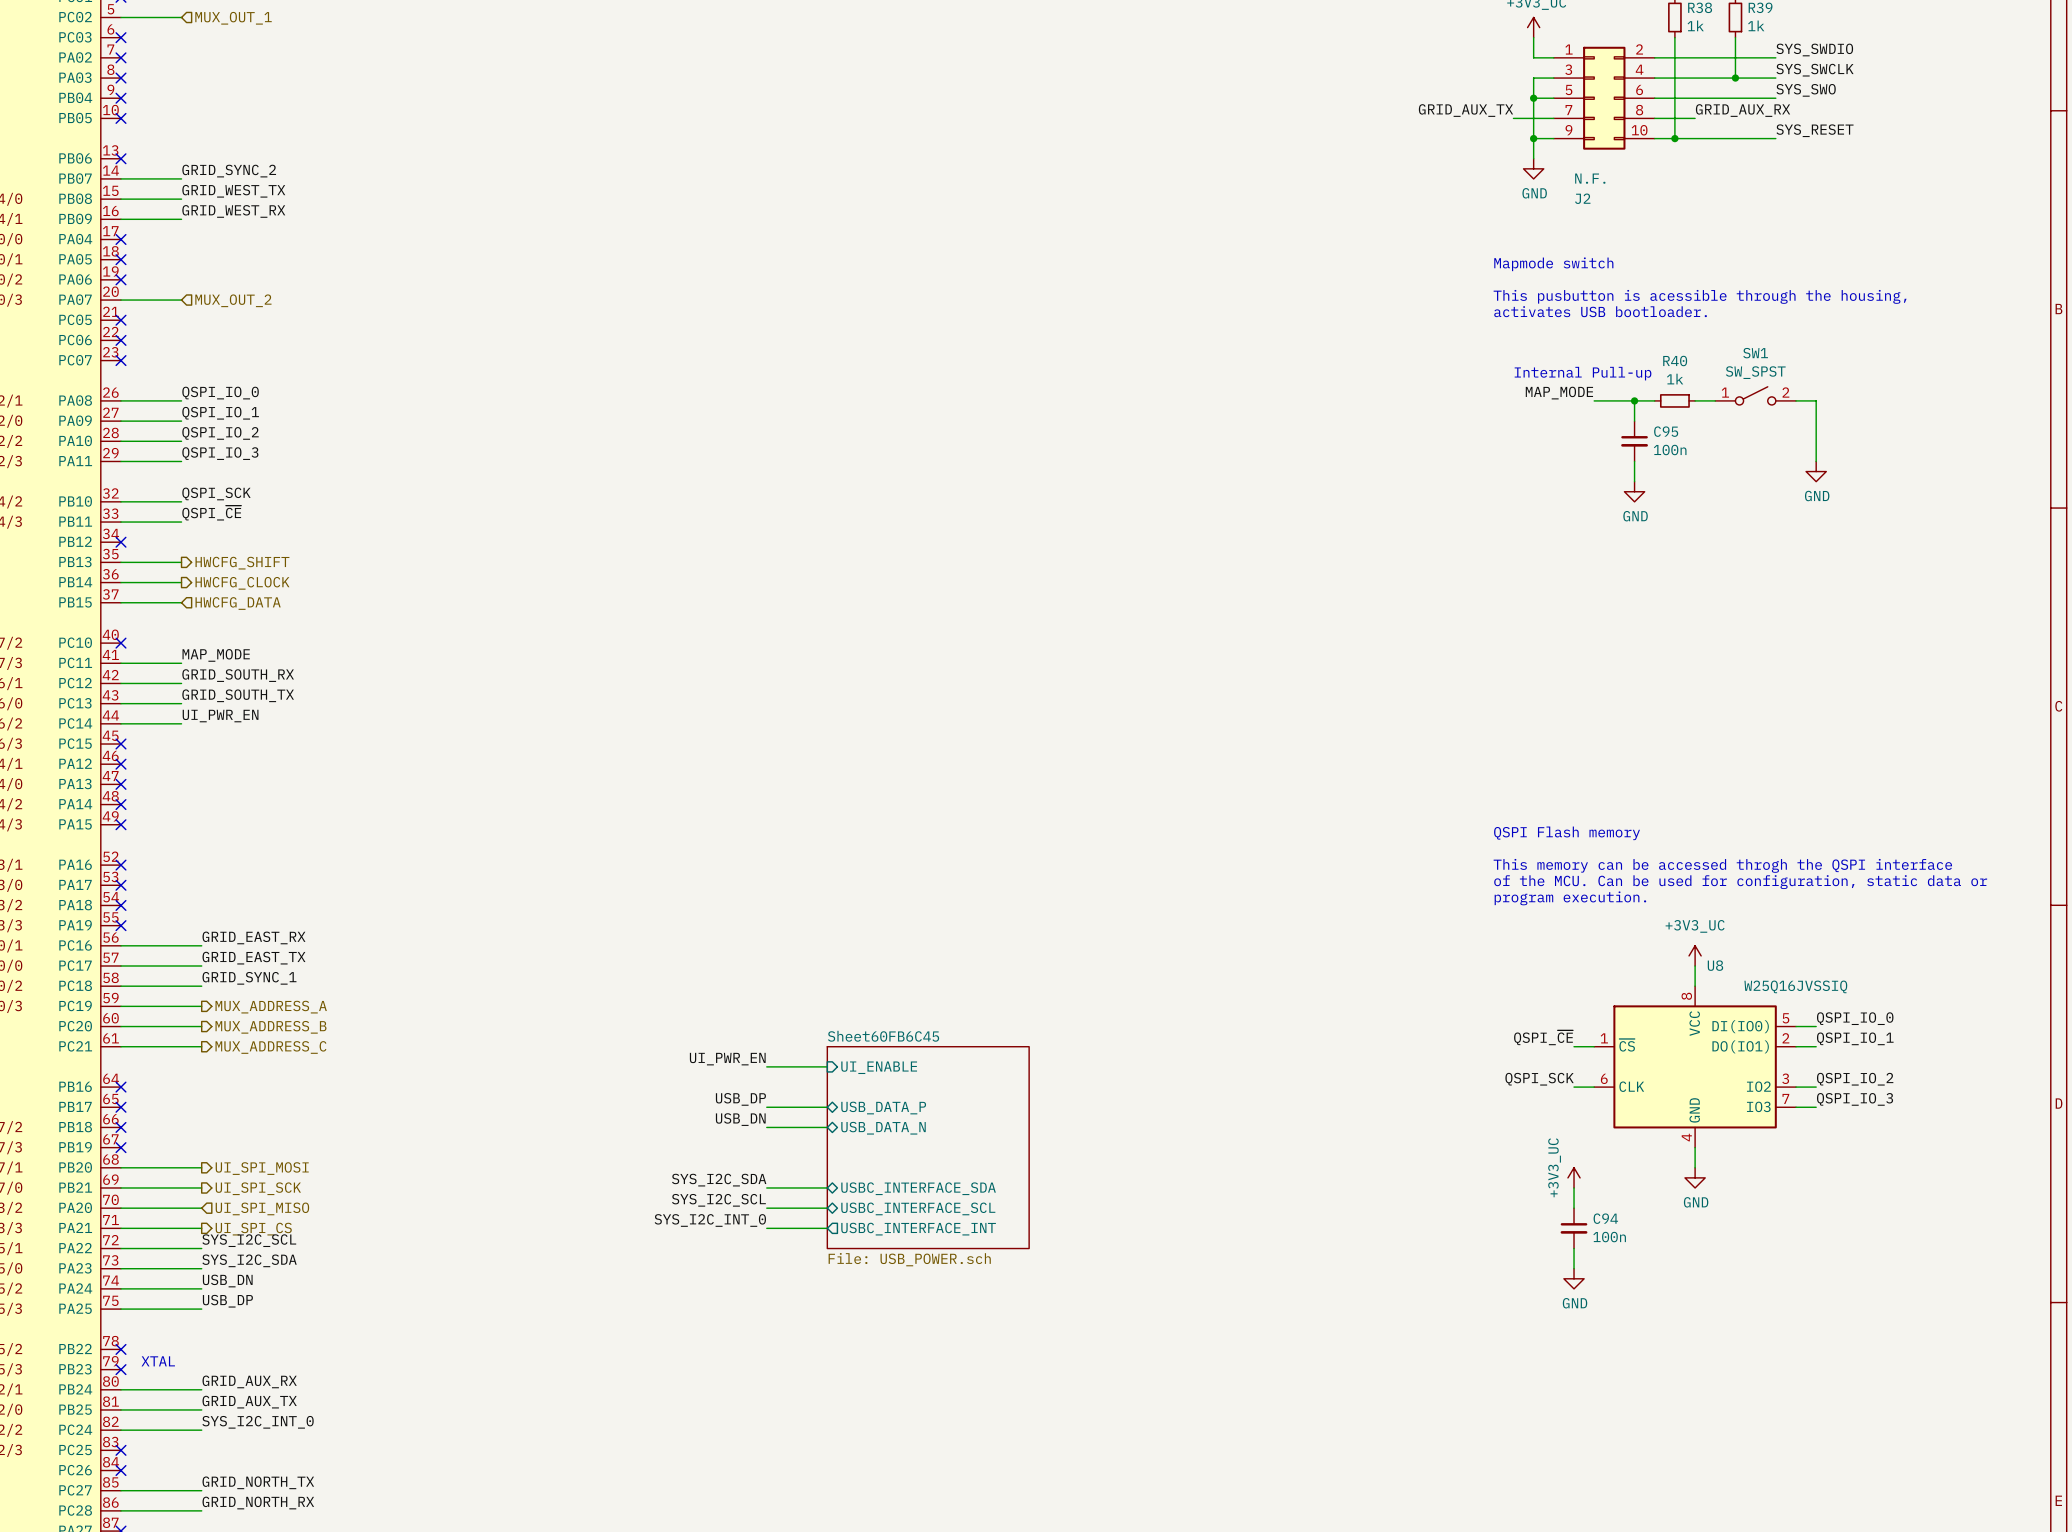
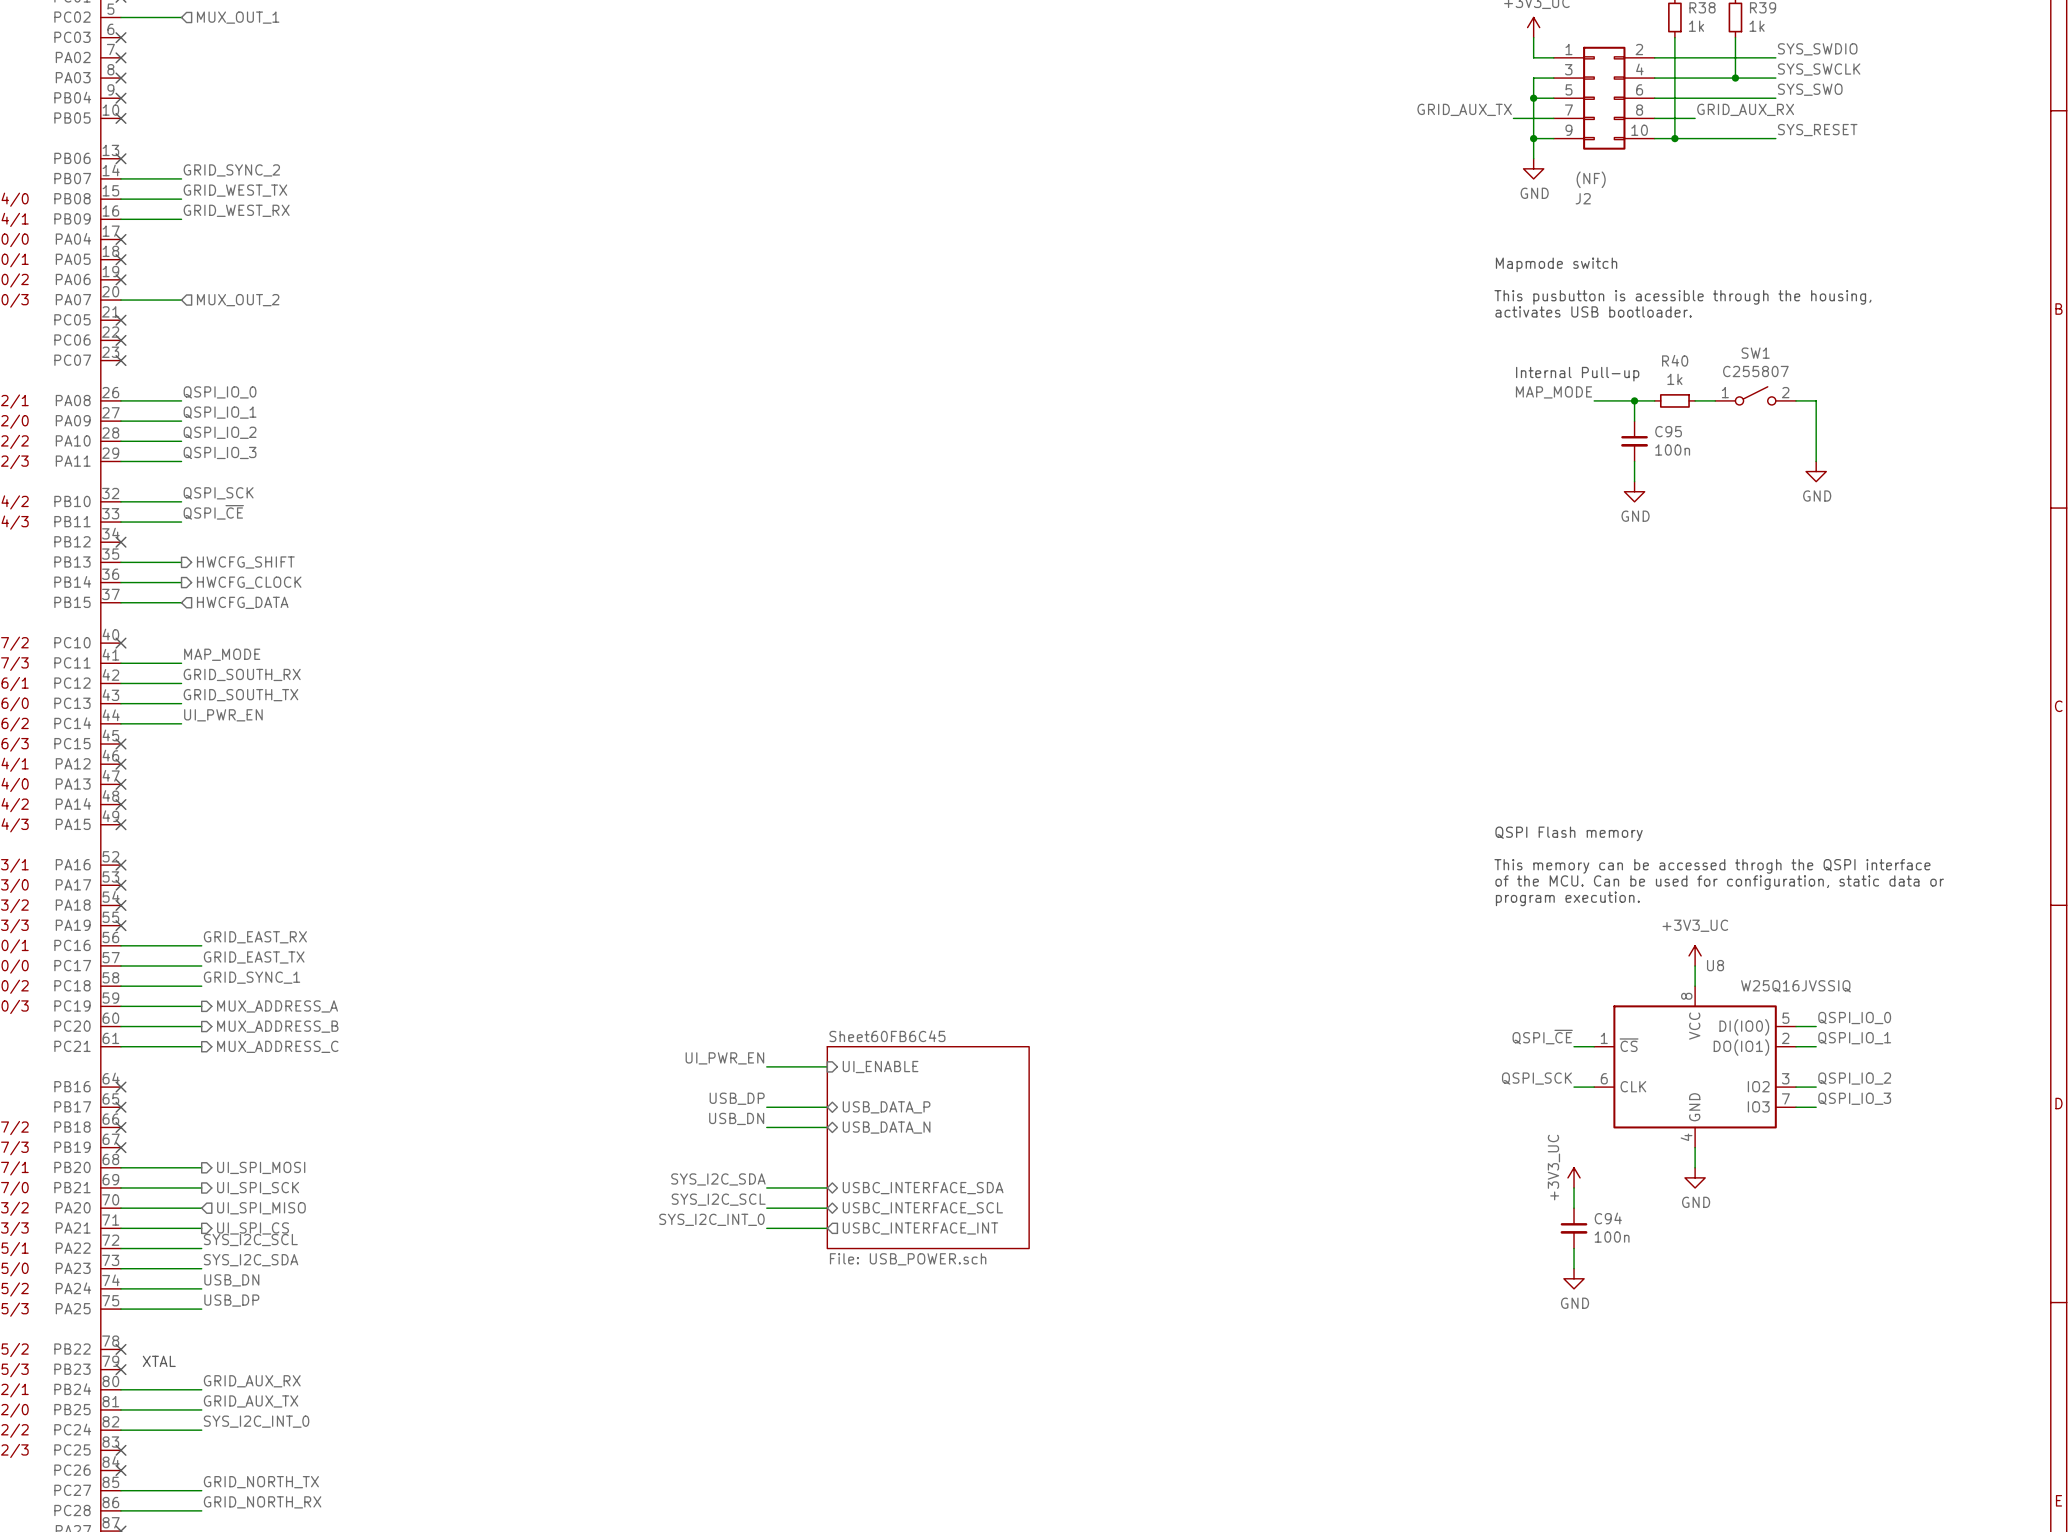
J2 value: N.F. (1590, 178) -> (NF) (1591, 179)
SW1 value: SW_SPST (1755, 372) -> C255807 (1755, 371)

